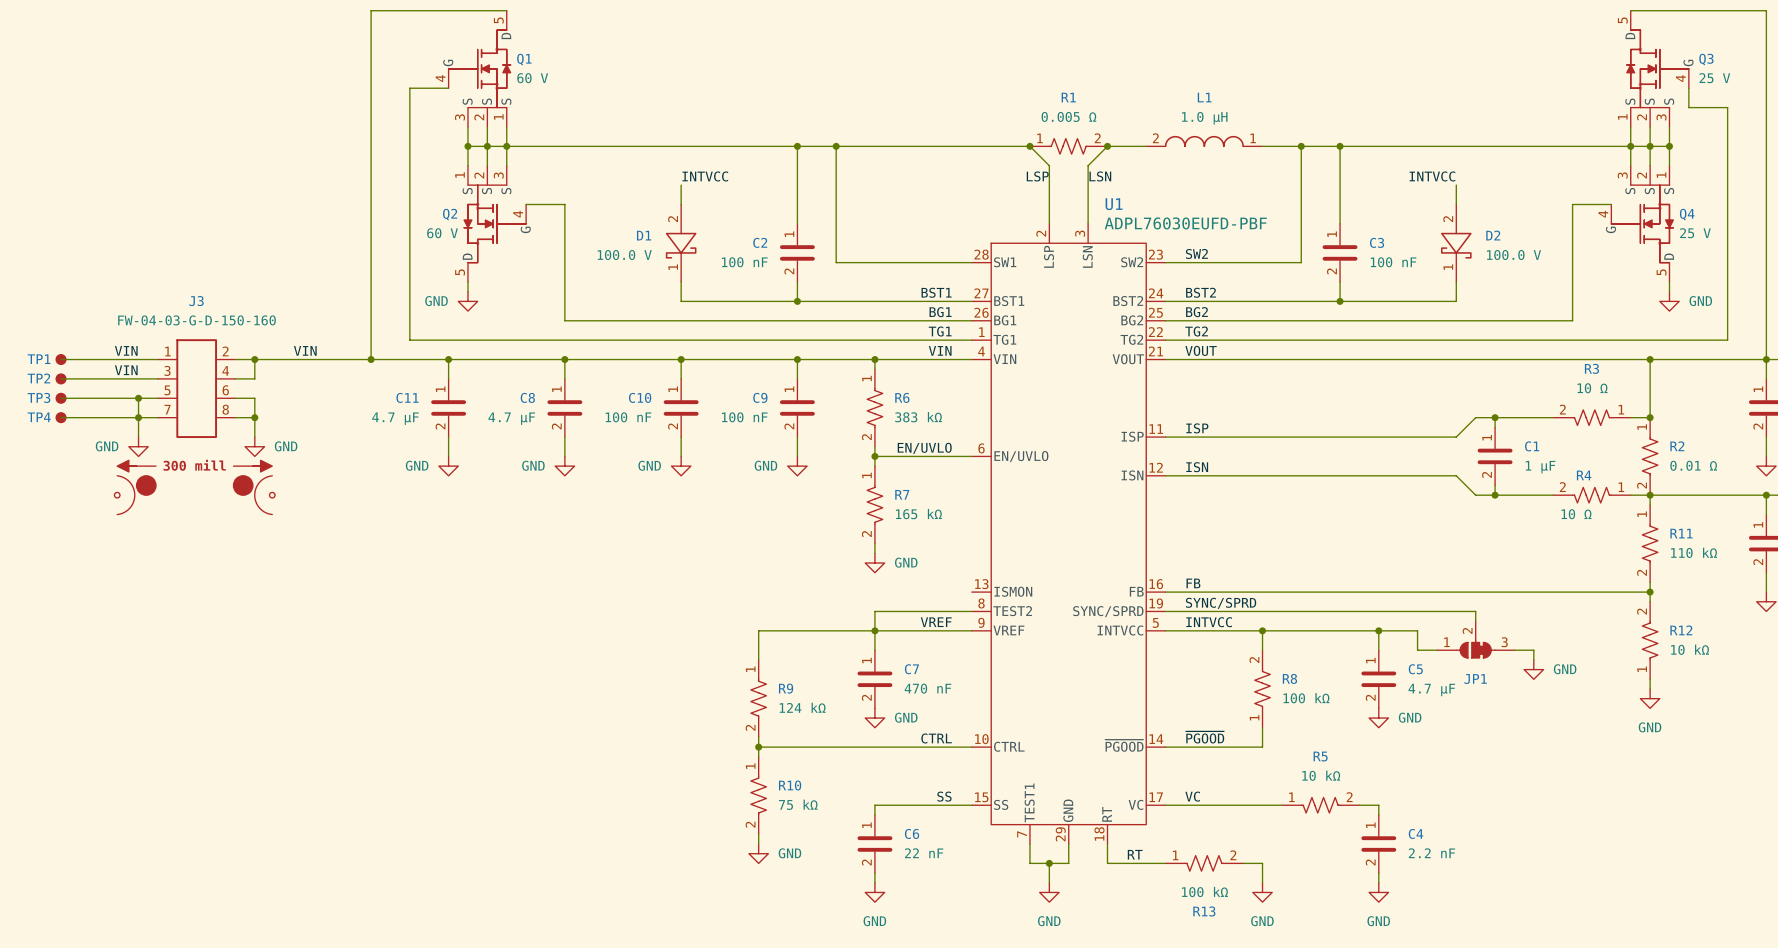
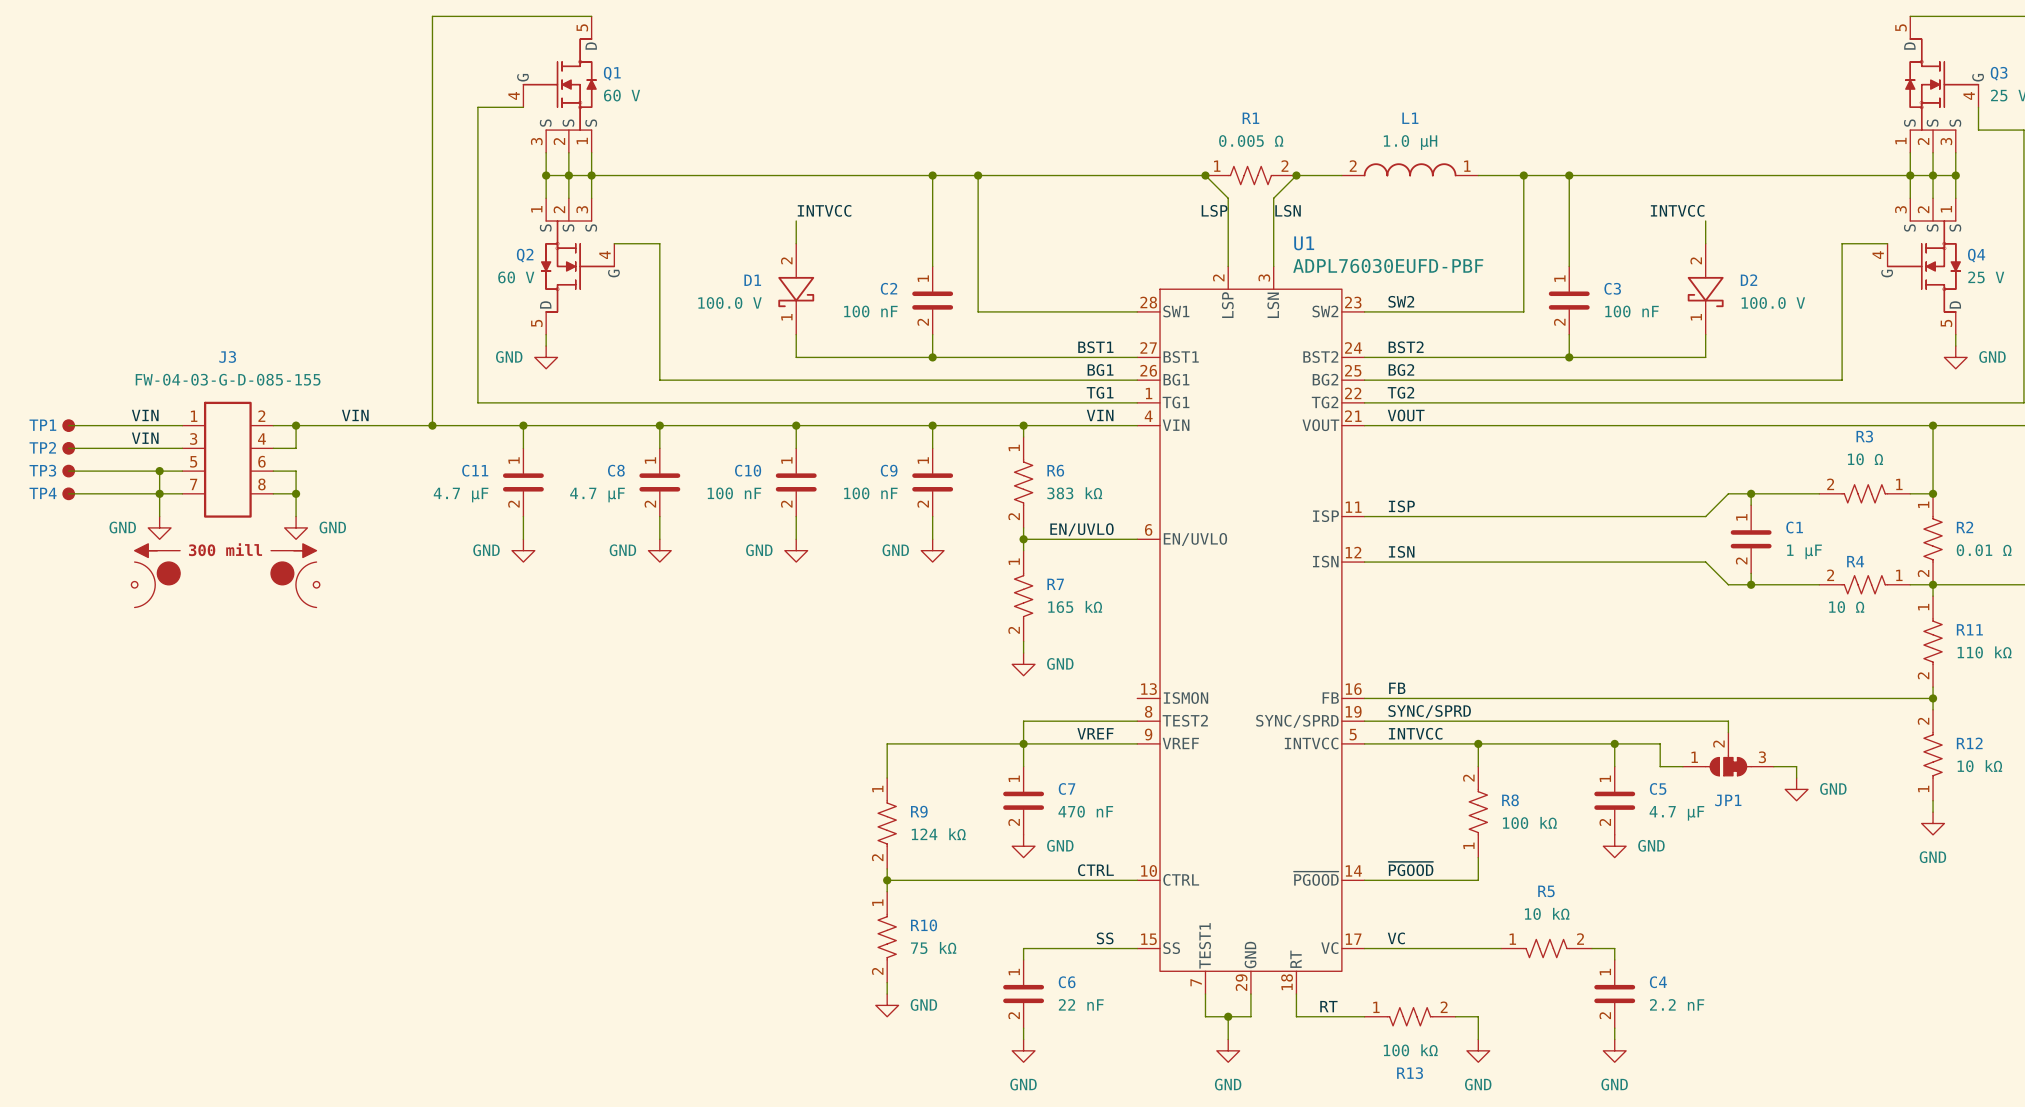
J3 value: FW-04-03-G-D-150-160 (197, 320) -> FW-04-03-G-D-085-155 (228, 379)

